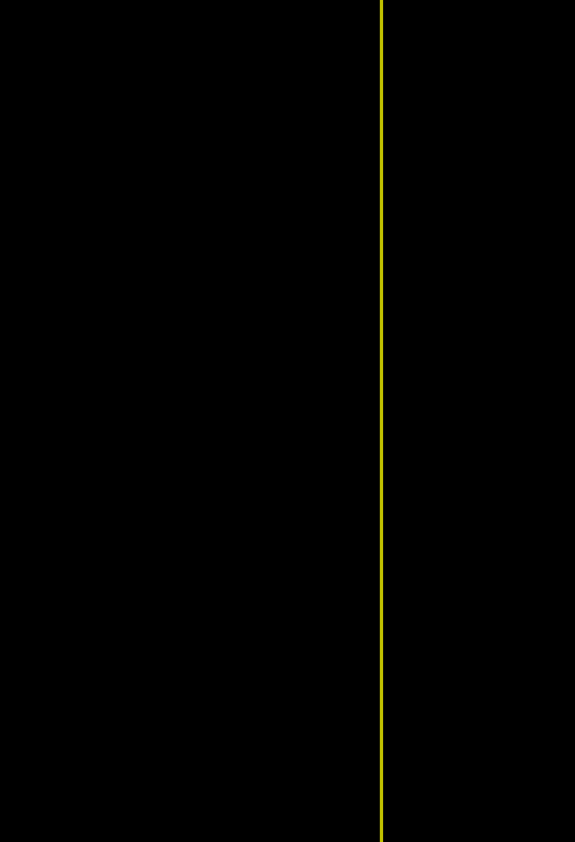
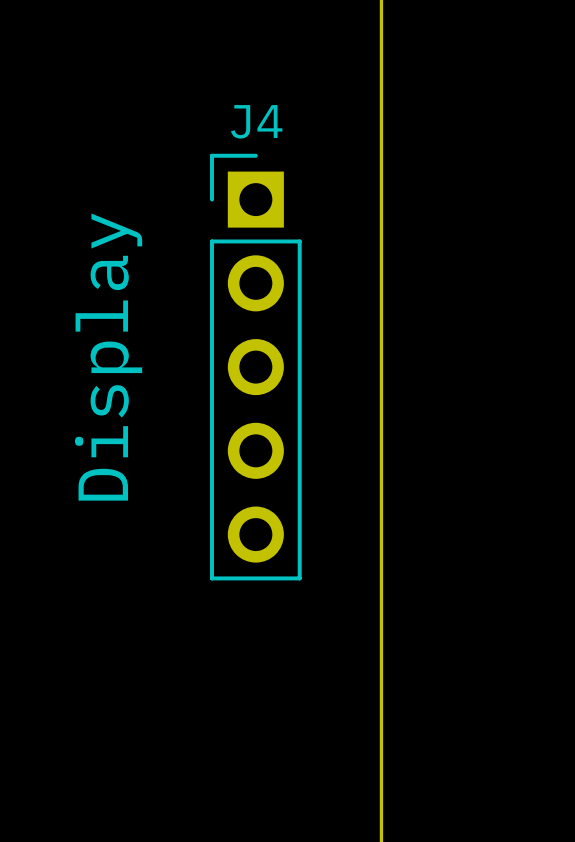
text: none -> Display (108, 357)
J4: none -> (255, 367)

